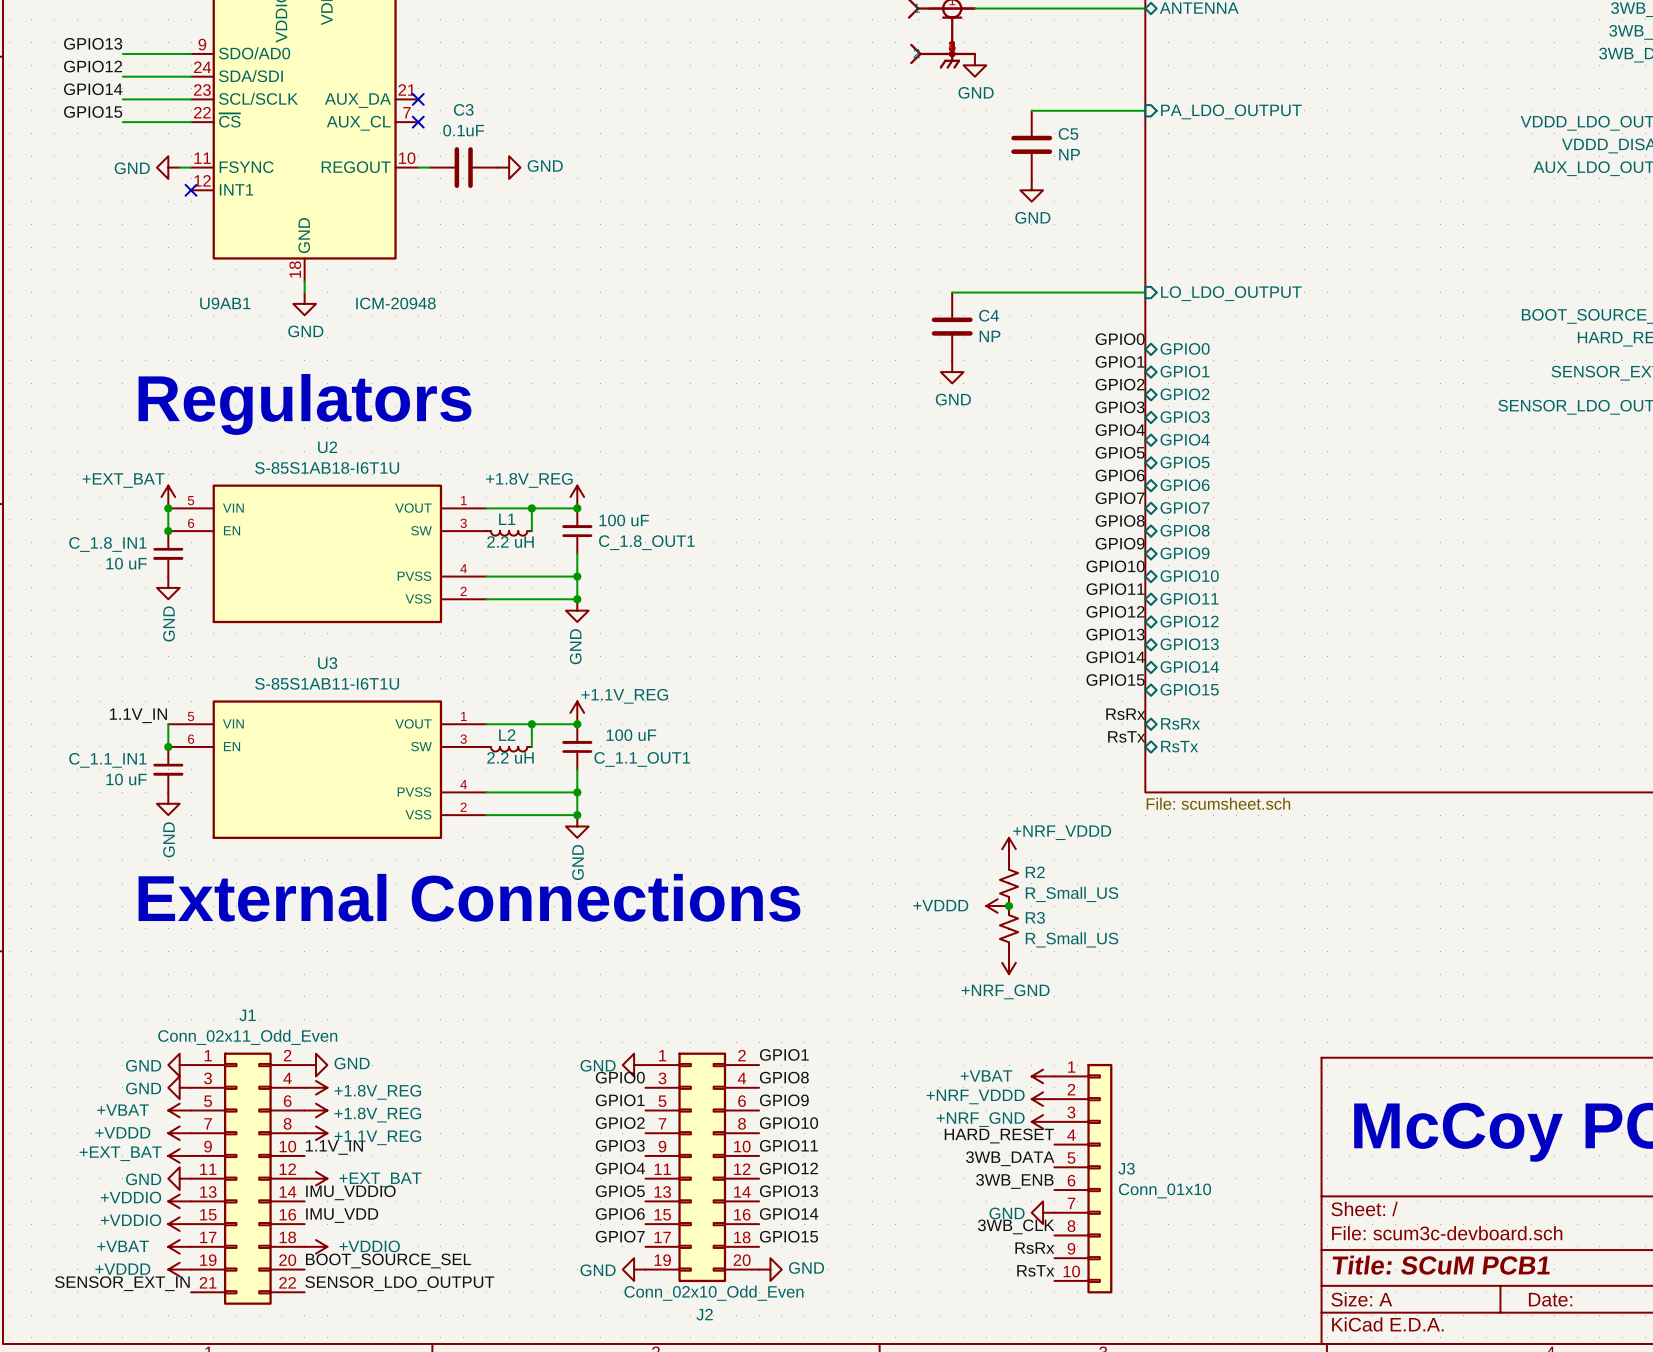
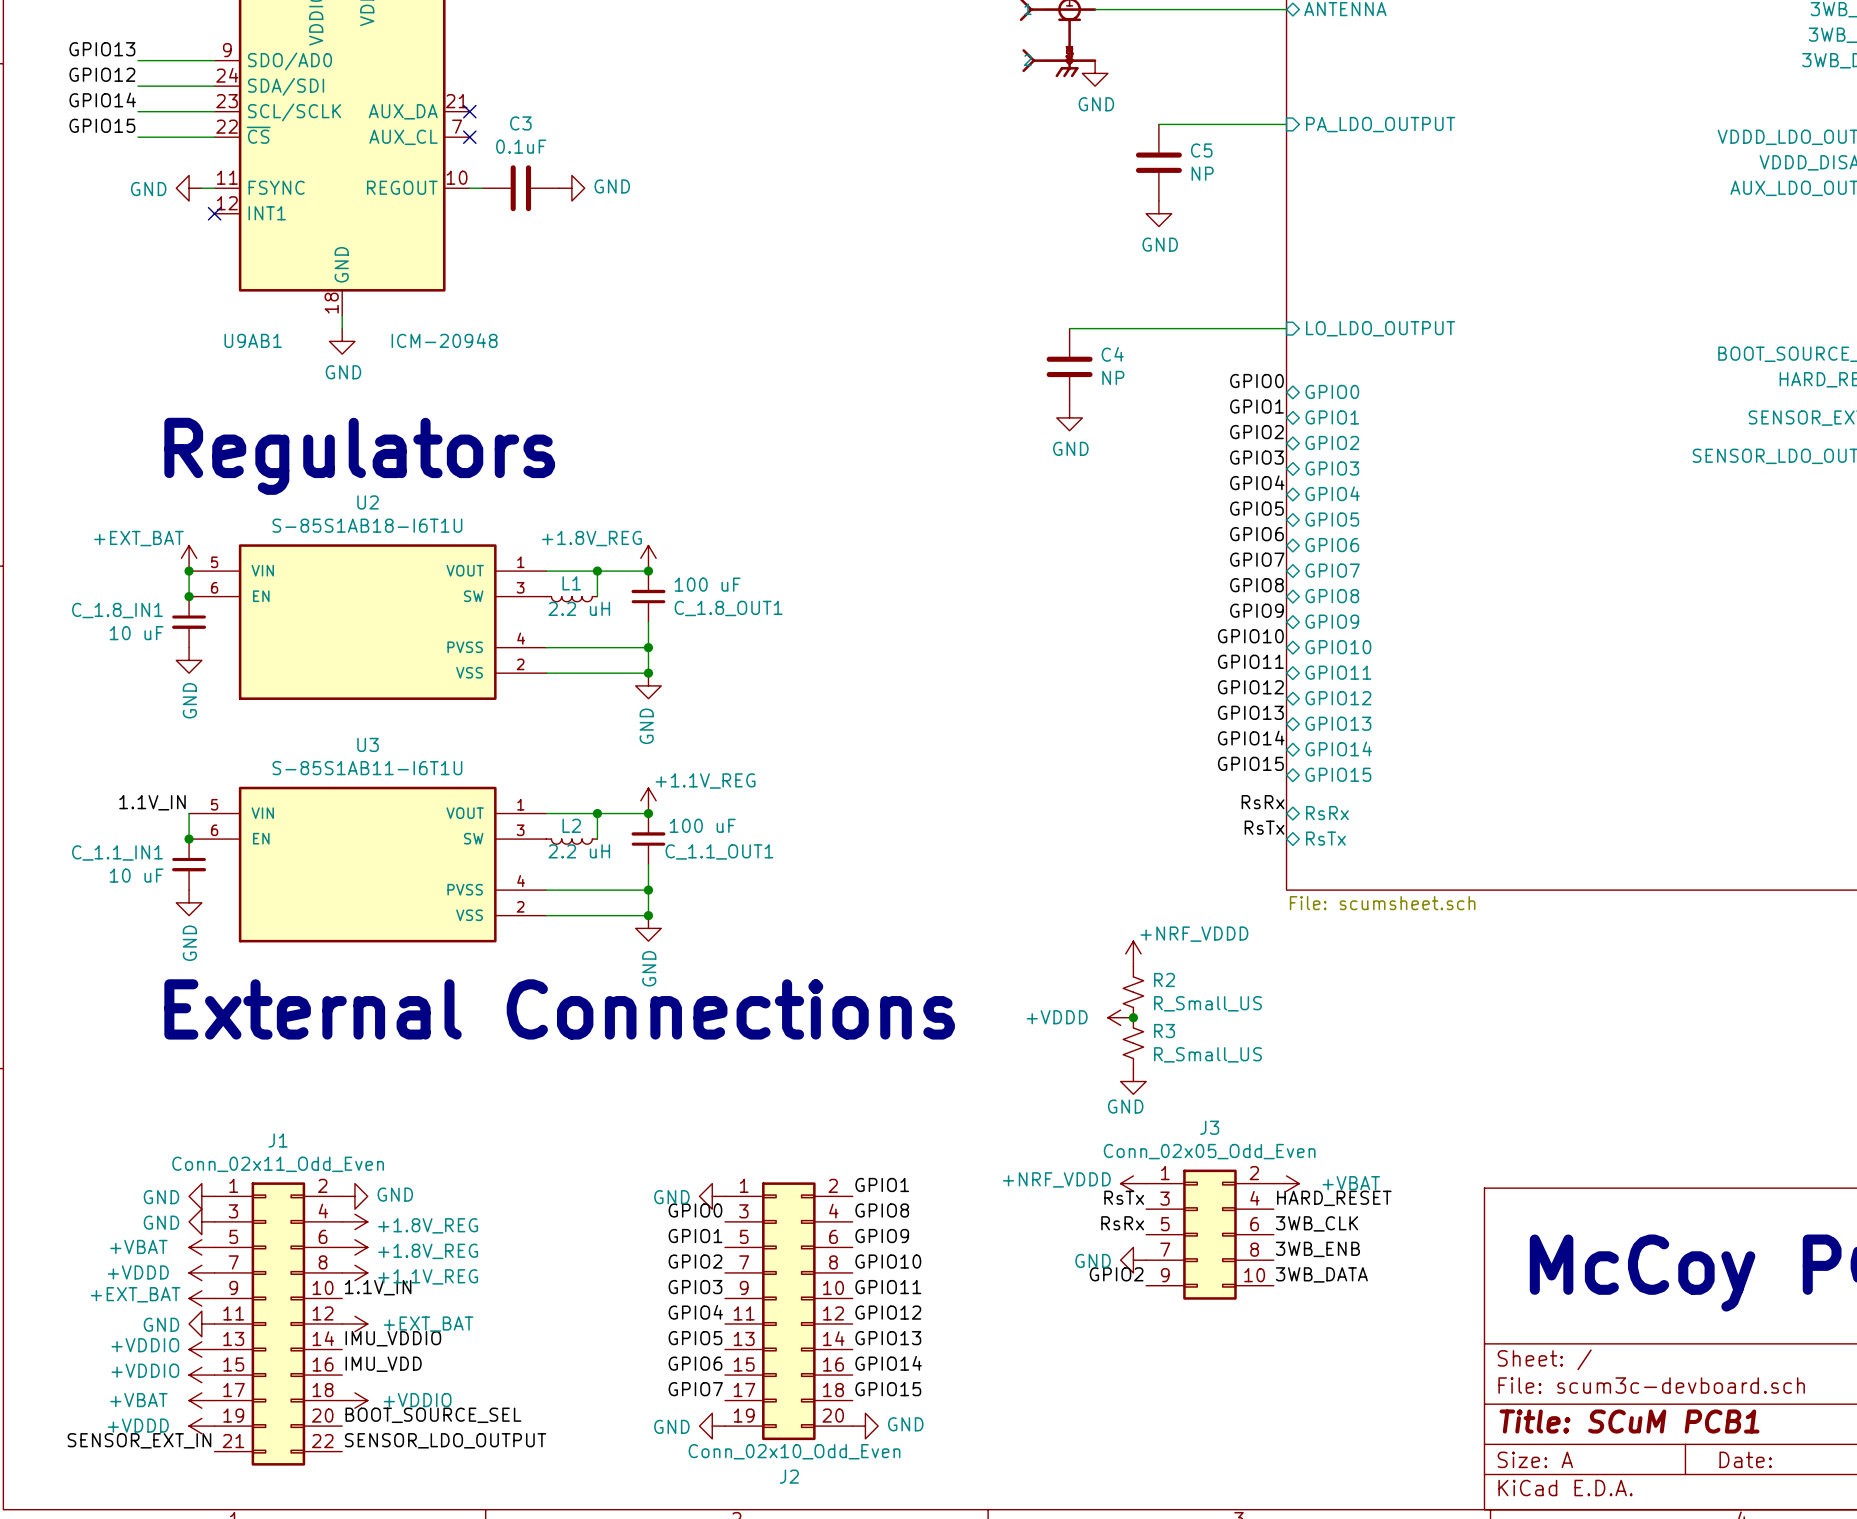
power symbol: +NRF_GND (1009, 962) -> GND (1133, 1081)
J3 symbol: [1054, 1063, 1113, 1294] -> [1146, 1169, 1274, 1300]
power symbol rotation: 0° (1043, 1076) -> 180° (1286, 1183)
power symbol position: +VBAT (1043, 1076) -> +VBAT (1286, 1183)
power symbol position: +NRF_VDDD (1043, 1099) -> +NRF_VDDD (1133, 1183)
power symbol: +NRF_GND (1043, 1121) -> none
label: none -> GPIO2 (1116, 1274)
label position: HARD_RESET (999, 1136) -> HARD_RESET (1334, 1198)
label position: 3WB_DATA (1010, 1158) -> 3WB_DATA (1321, 1274)
J3 name position: J3 (1126, 1168) -> J3 (1209, 1127)
label position: 3WB_ENB (1014, 1181) -> 3WB_ENB (1317, 1249)
J3 value: Conn_01x10 (1164, 1190) -> Conn_02x05_Odd_Even (1209, 1151)
power symbol position: GND (1043, 1212) -> GND (1133, 1260)
label position: 3WB_CLK (1016, 1226) -> 3WB_CLK (1317, 1223)
label position: RsRx (1034, 1248) -> RsRx (1122, 1223)
label position: RsTx (1035, 1270) -> RsTx (1124, 1197)

